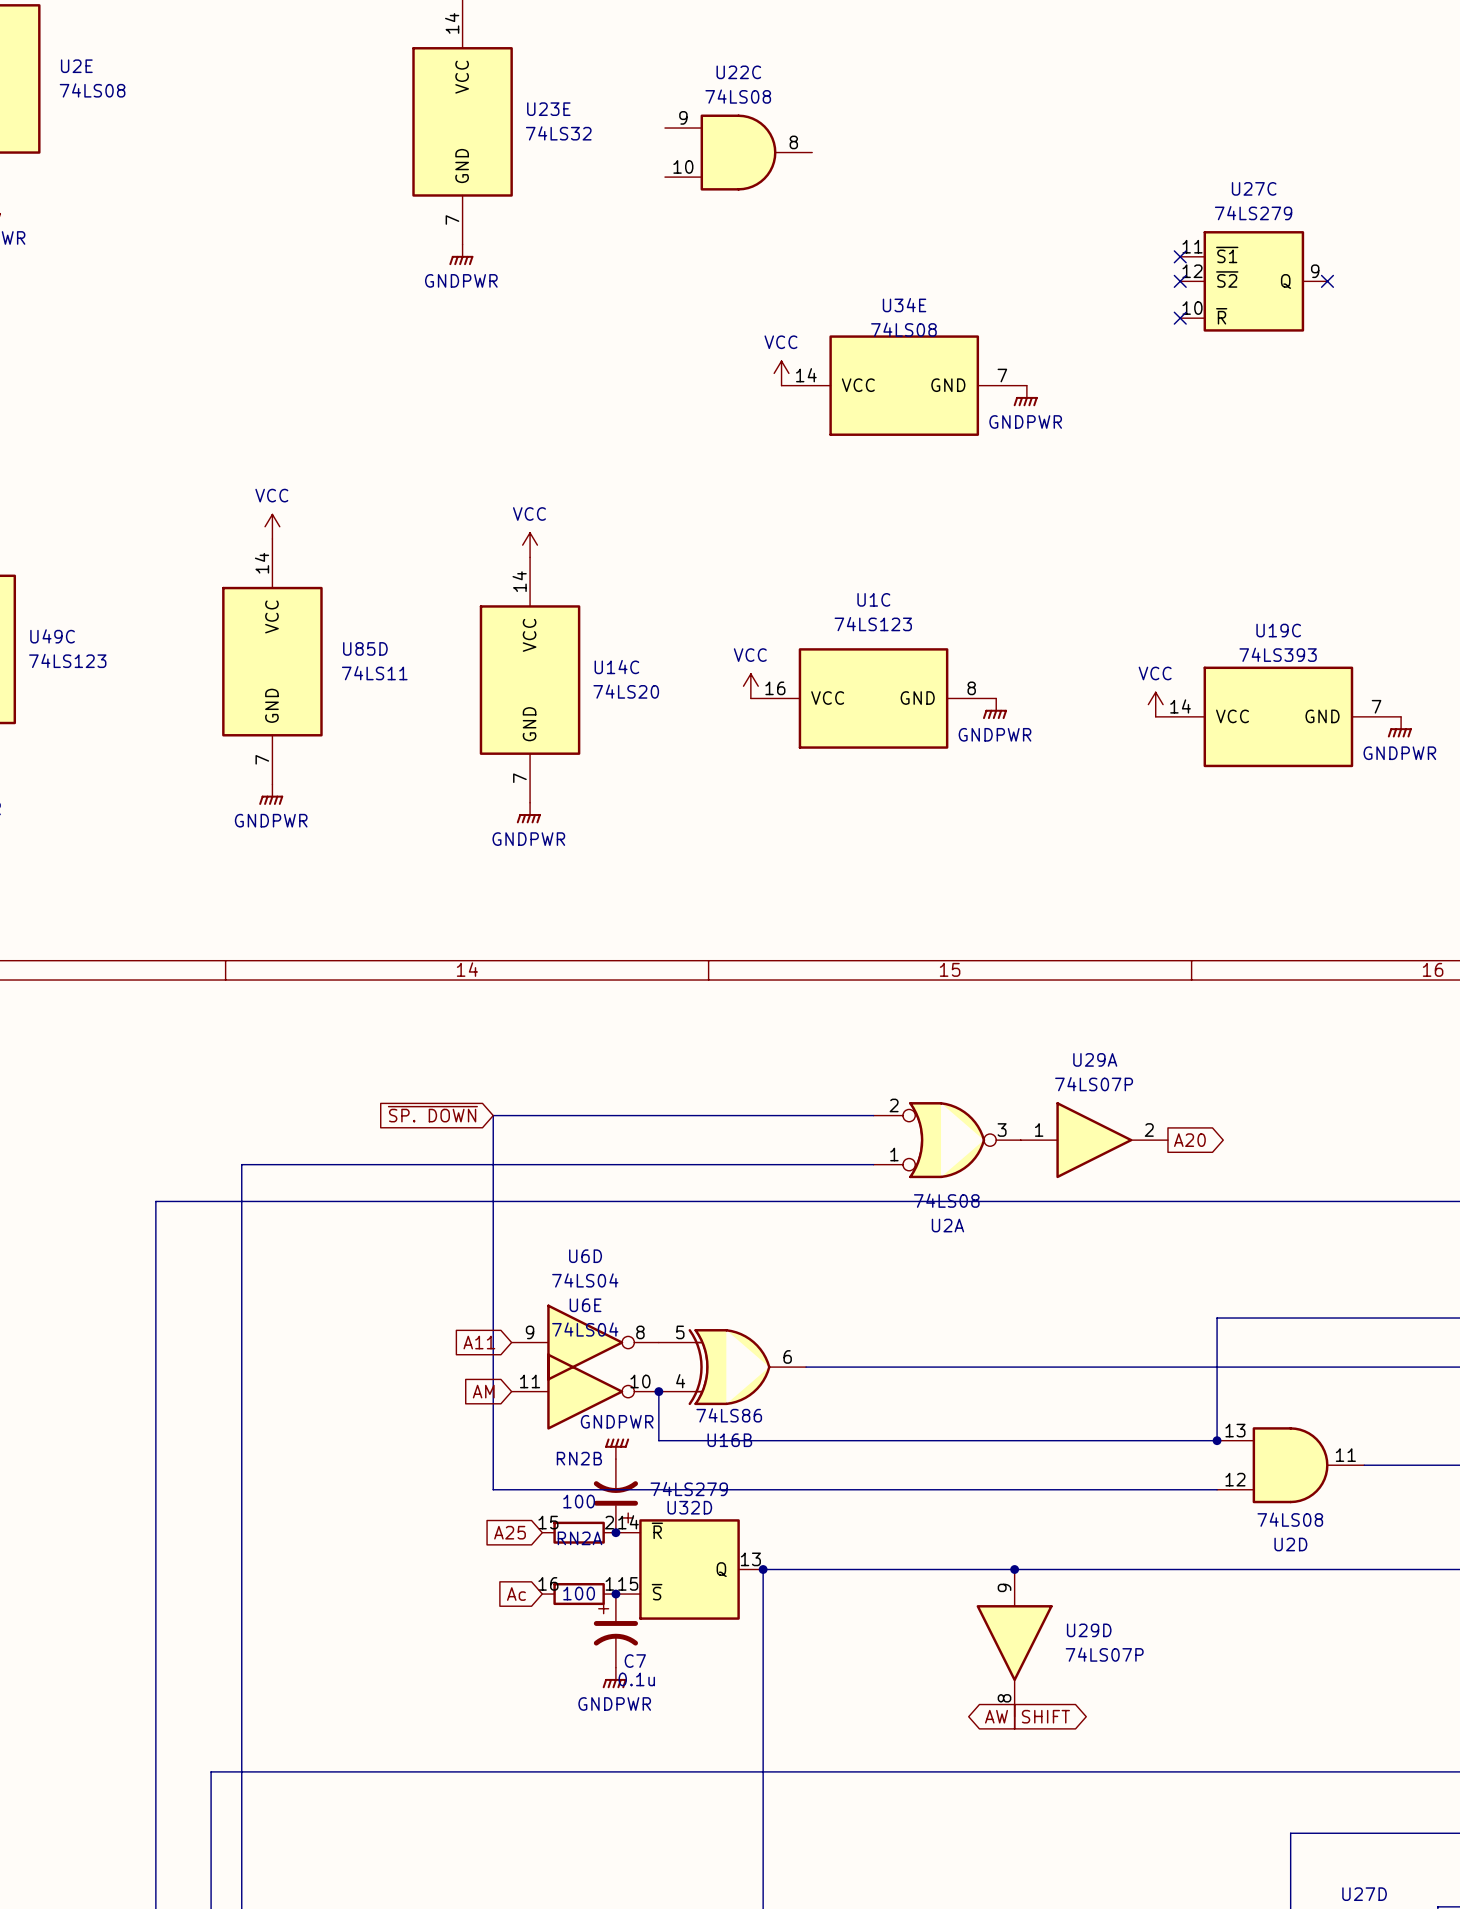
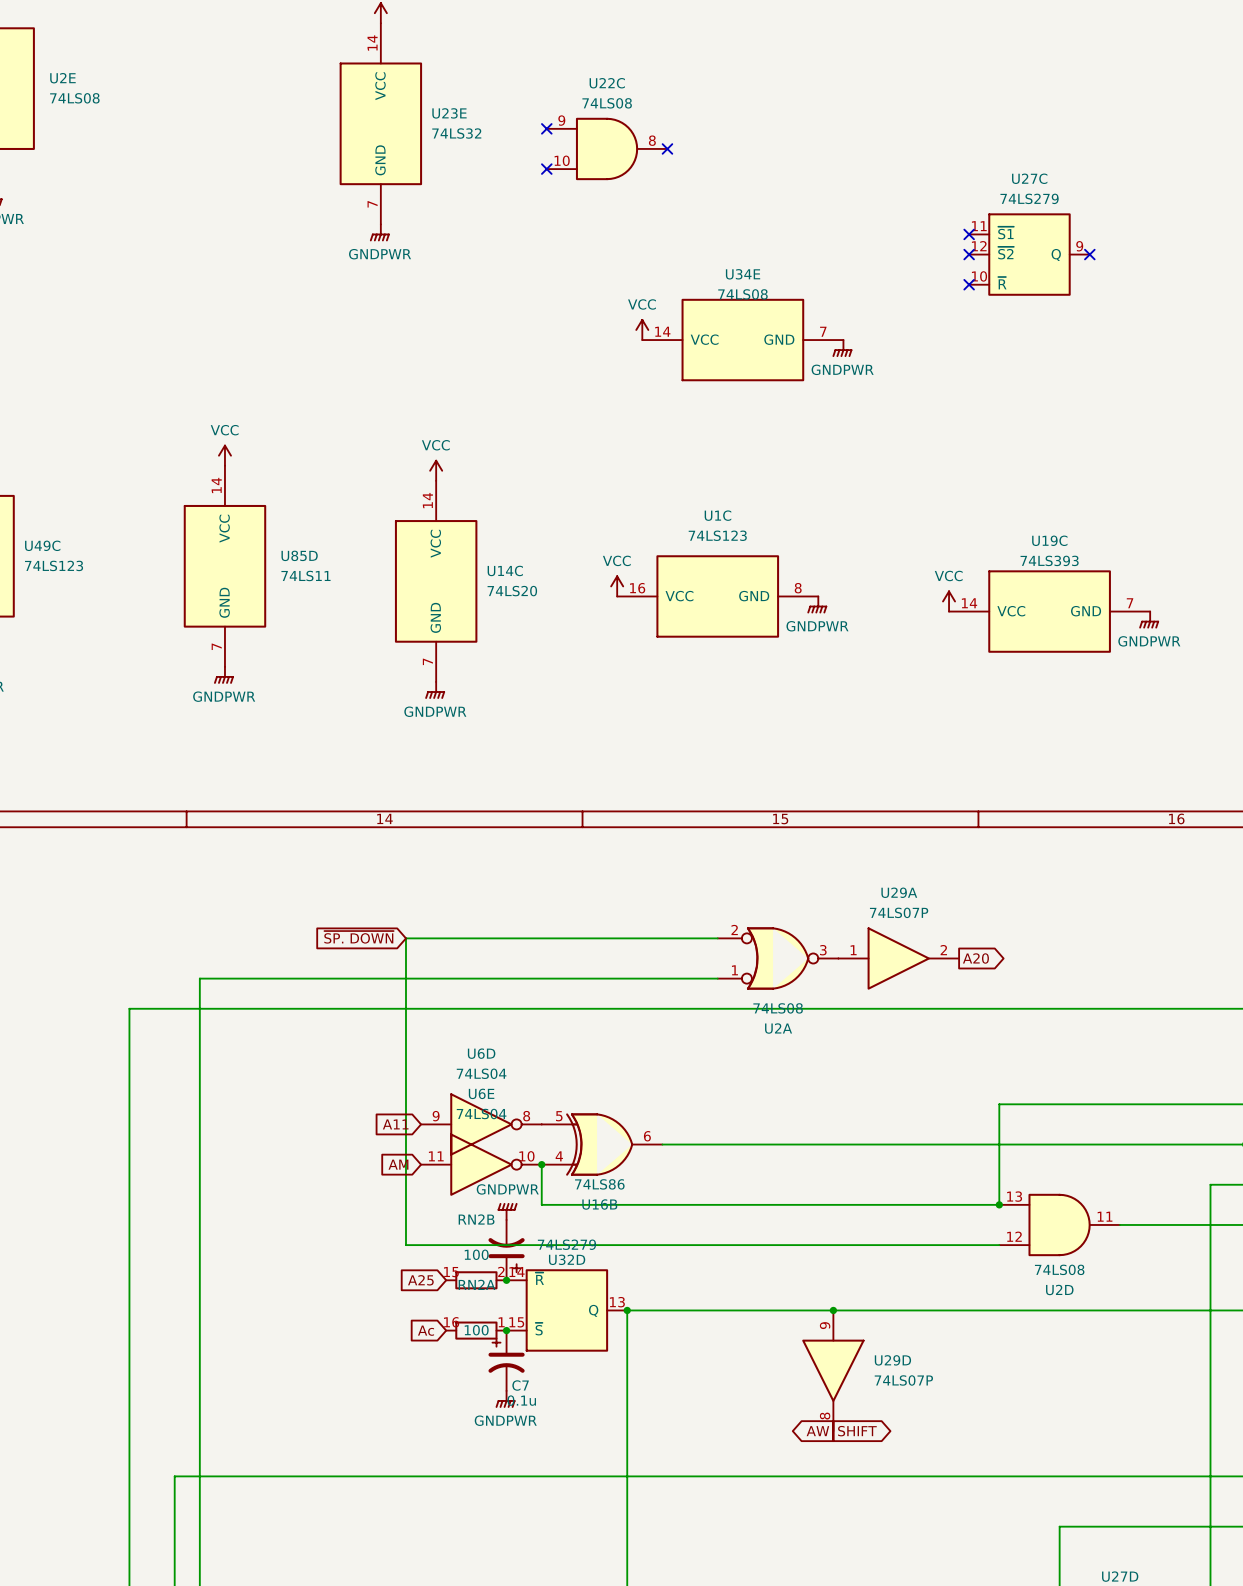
no-connect mark: none -> (546, 128)
no-connect mark: none -> (667, 148)
no-connect mark: none -> (546, 169)

